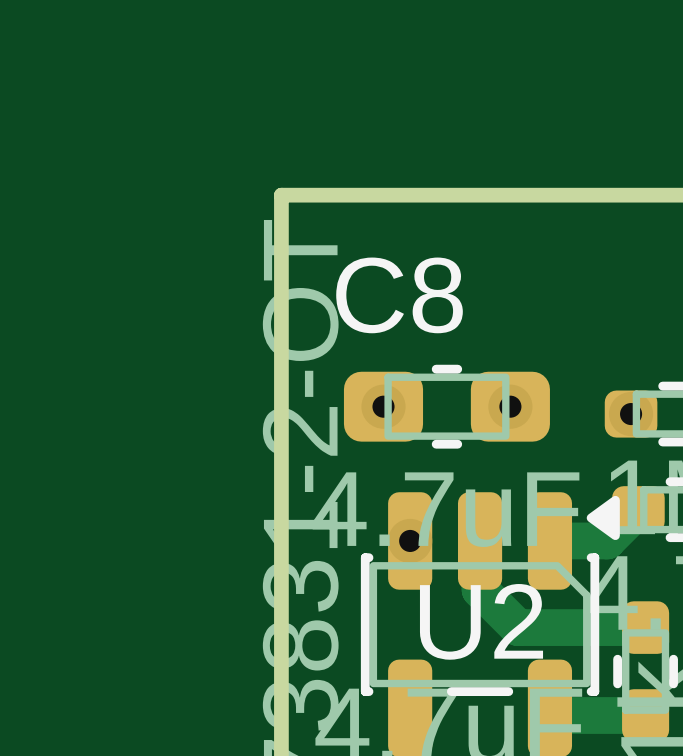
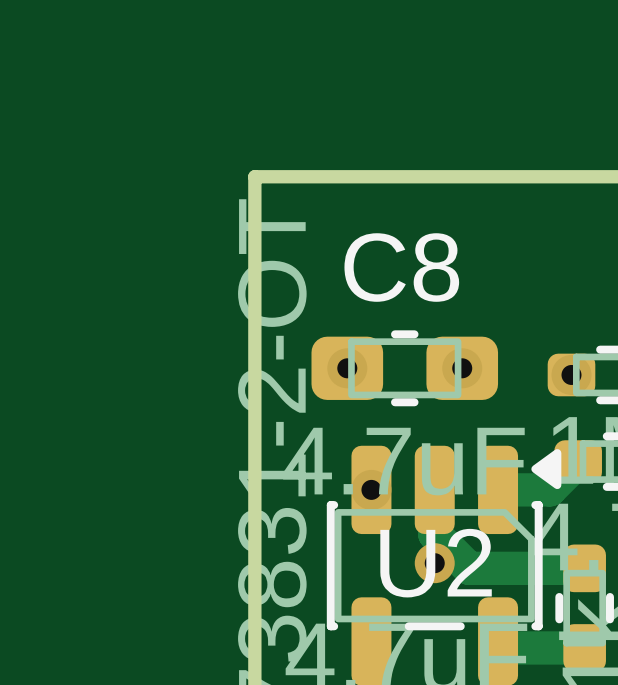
C8 name position: C8 (399, 295) -> C8 (401, 267)
via: none -> (434, 563)

